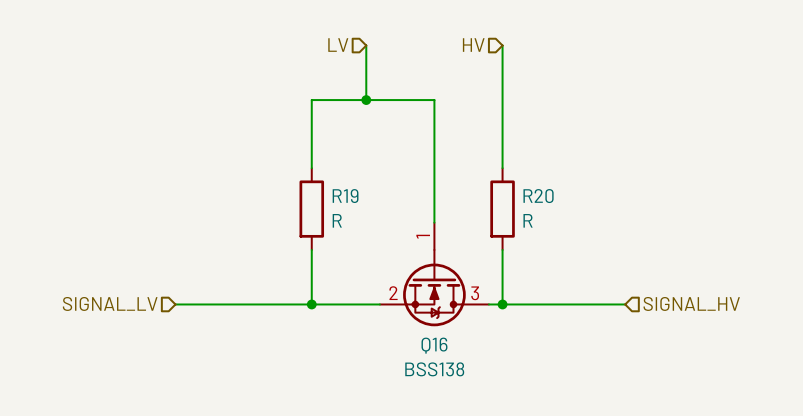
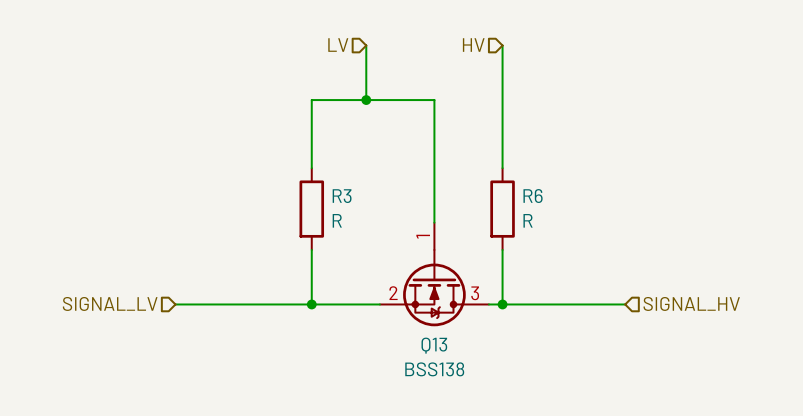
R19 name: R19 (345, 196) -> R3 (342, 196)
R20 name: R20 (538, 196) -> R6 (533, 196)
Q16 name: Q16 (434, 345) -> Q13 (434, 345)

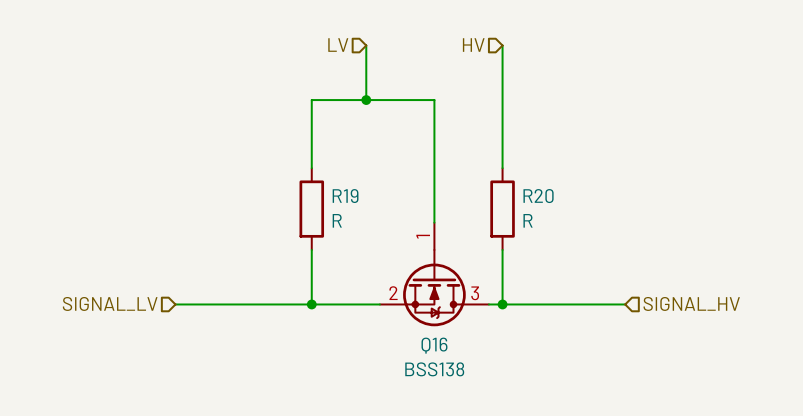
R3 name: R3 (342, 196) -> R19 (345, 196)
R6 name: R6 (533, 196) -> R20 (538, 196)
Q13 name: Q13 (434, 345) -> Q16 (434, 345)

